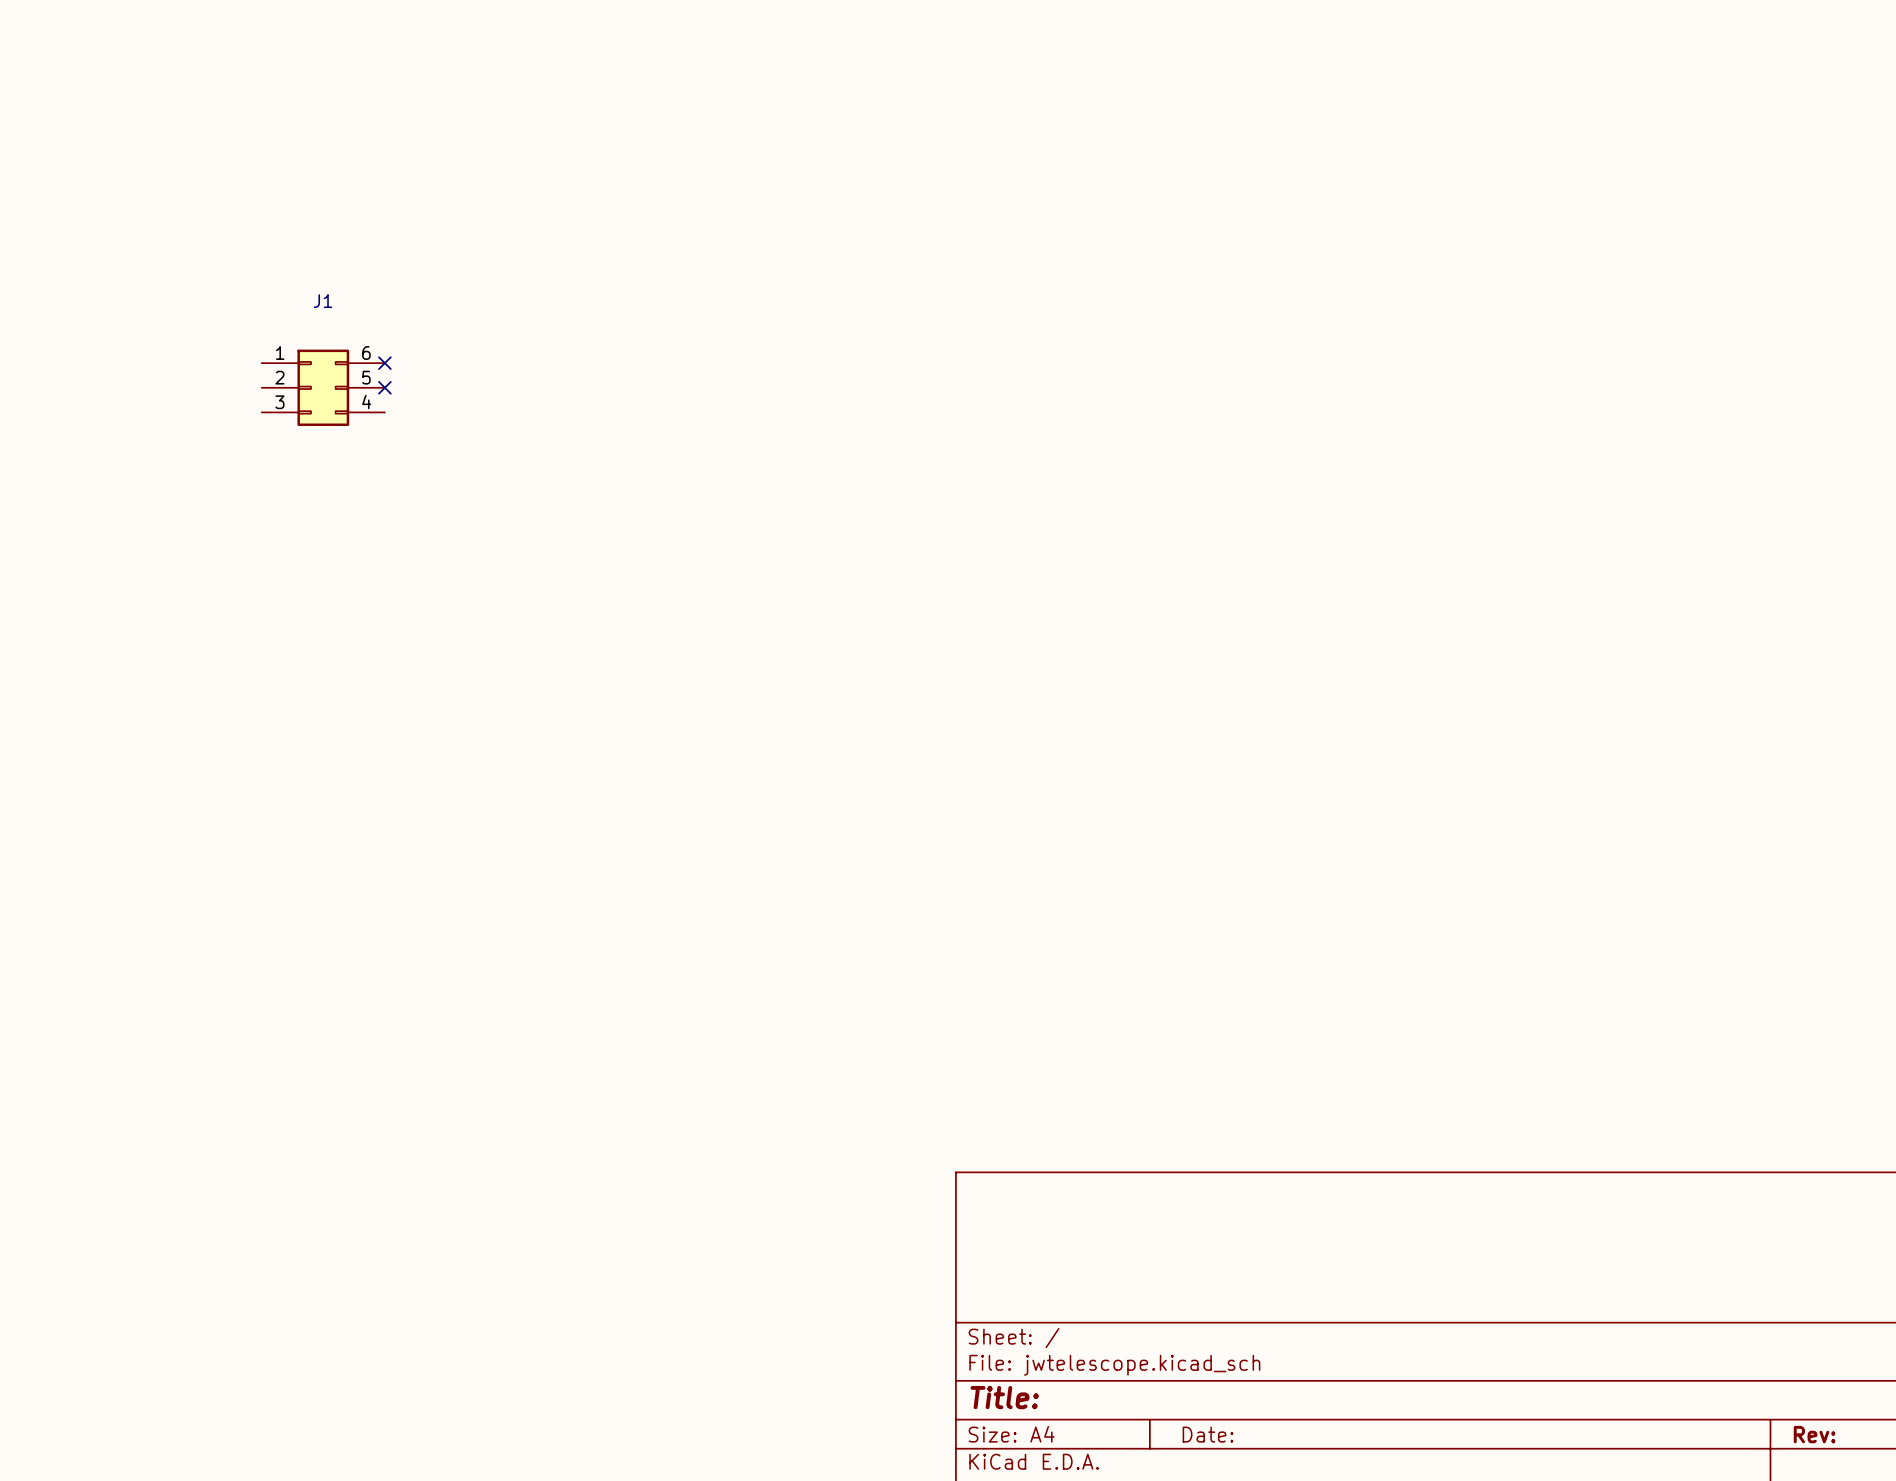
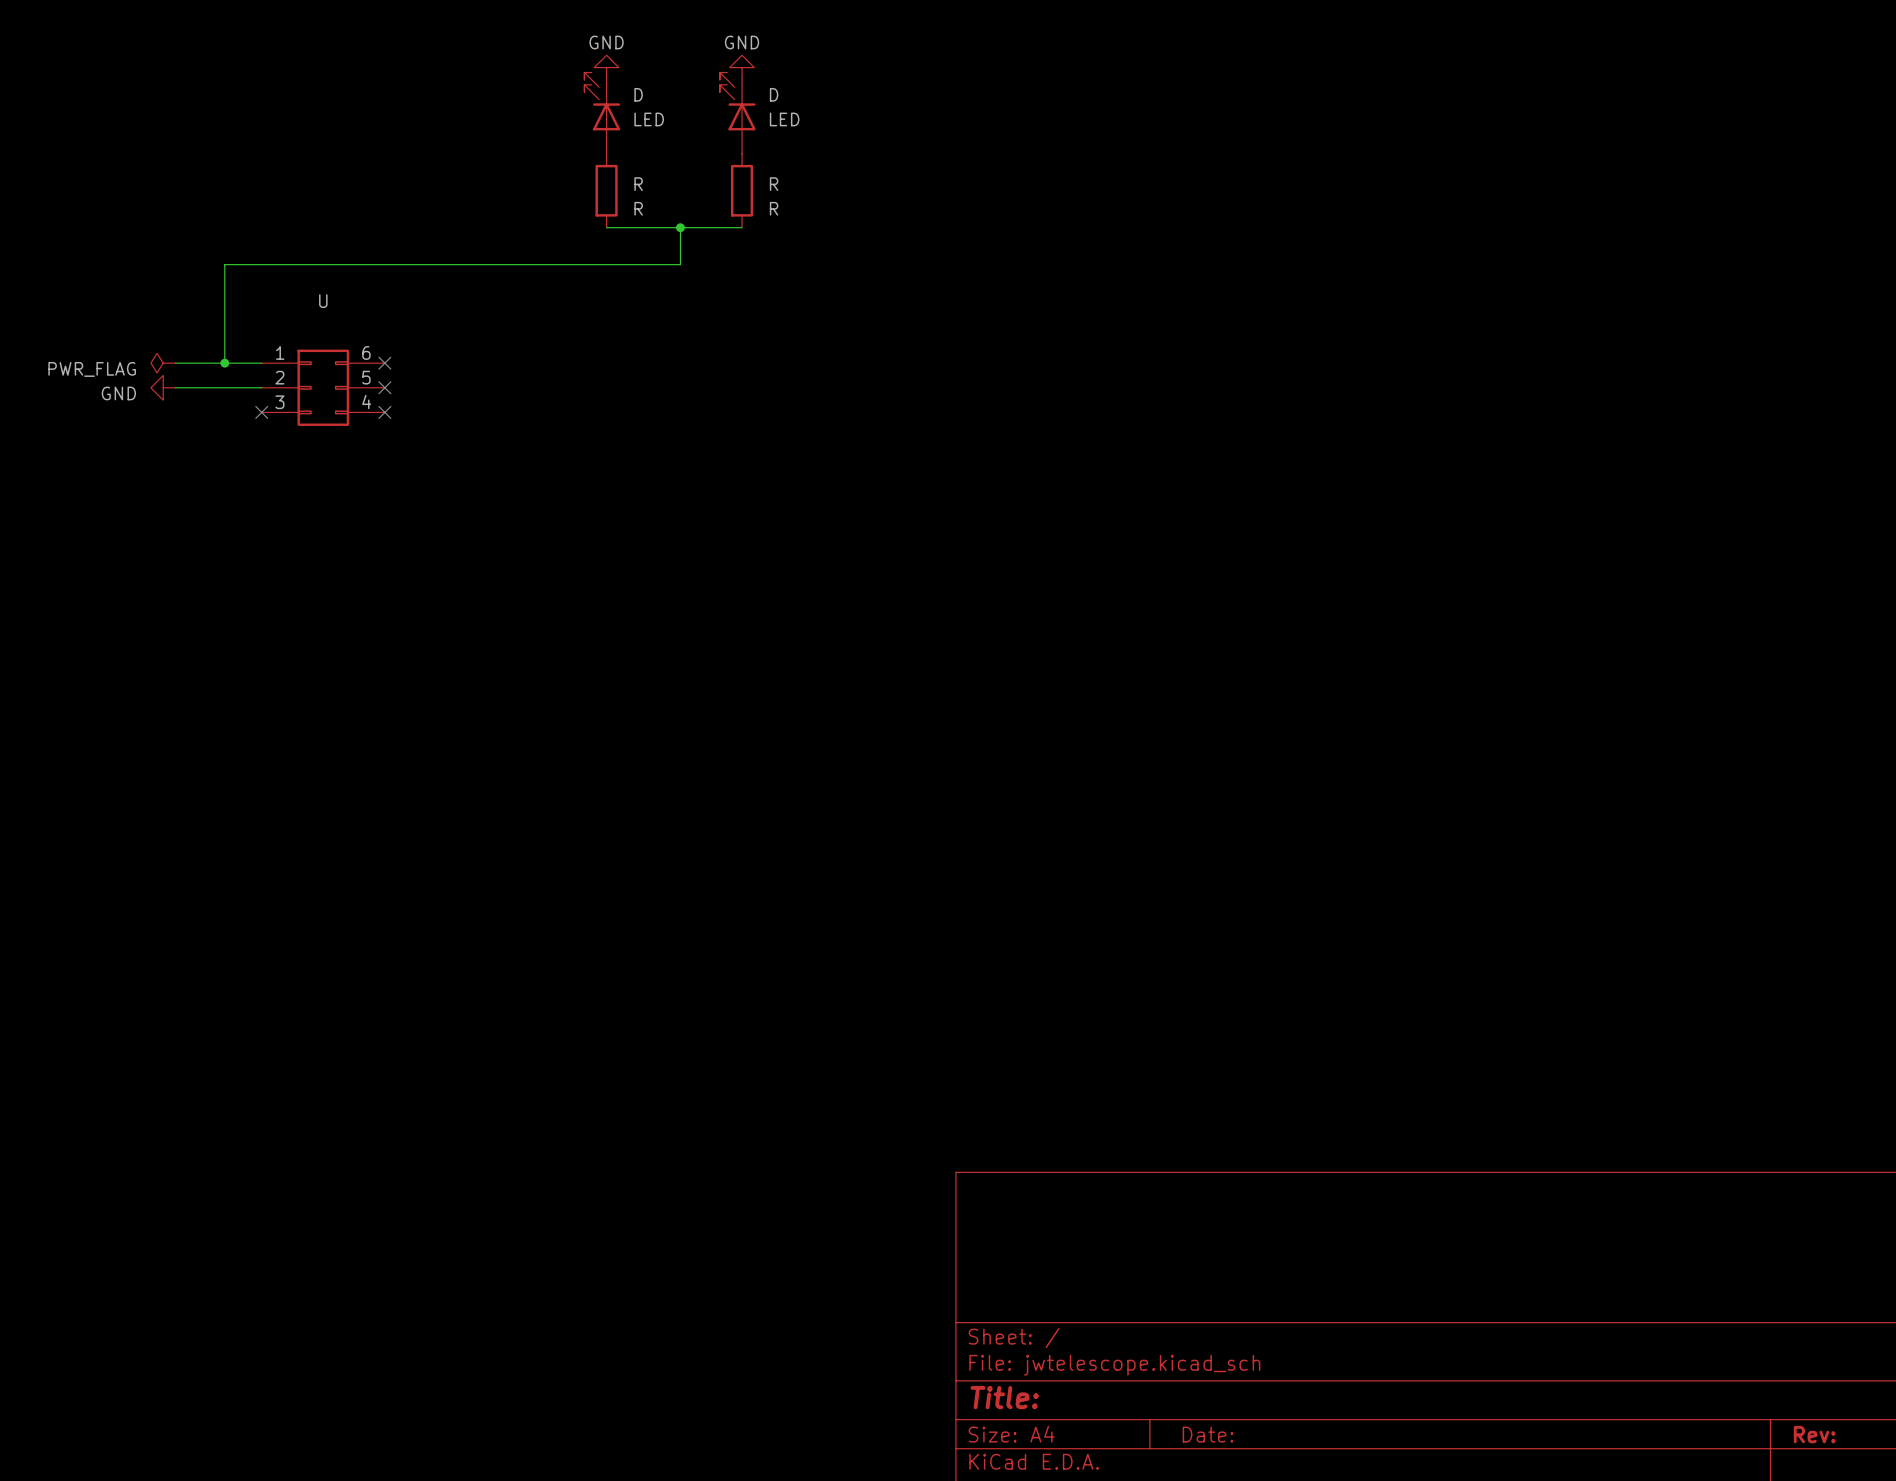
power symbol: none -> GND (606, 67)
power symbol: none -> GND (742, 67)
D: none -> LED (602, 113)
D: none -> LED (737, 113)
R: none -> R (606, 190)
R: none -> R (742, 190)
wire: none -> (606, 227) (742, 227)
wire: none -> (680, 227) (680, 264) (224, 264) (224, 363)
junction: none -> (680, 227)
J1 name: J1 (323, 301) -> U (323, 301)
power symbol: none -> PWR_FLAG (163, 363)
wire: none -> (175, 363) (261, 363)
junction: none -> (224, 363)
power symbol: none -> GND (163, 387)
wire: none -> (175, 387) (261, 387)
no-connect mark: none -> (261, 412)
no-connect mark: none -> (384, 412)

